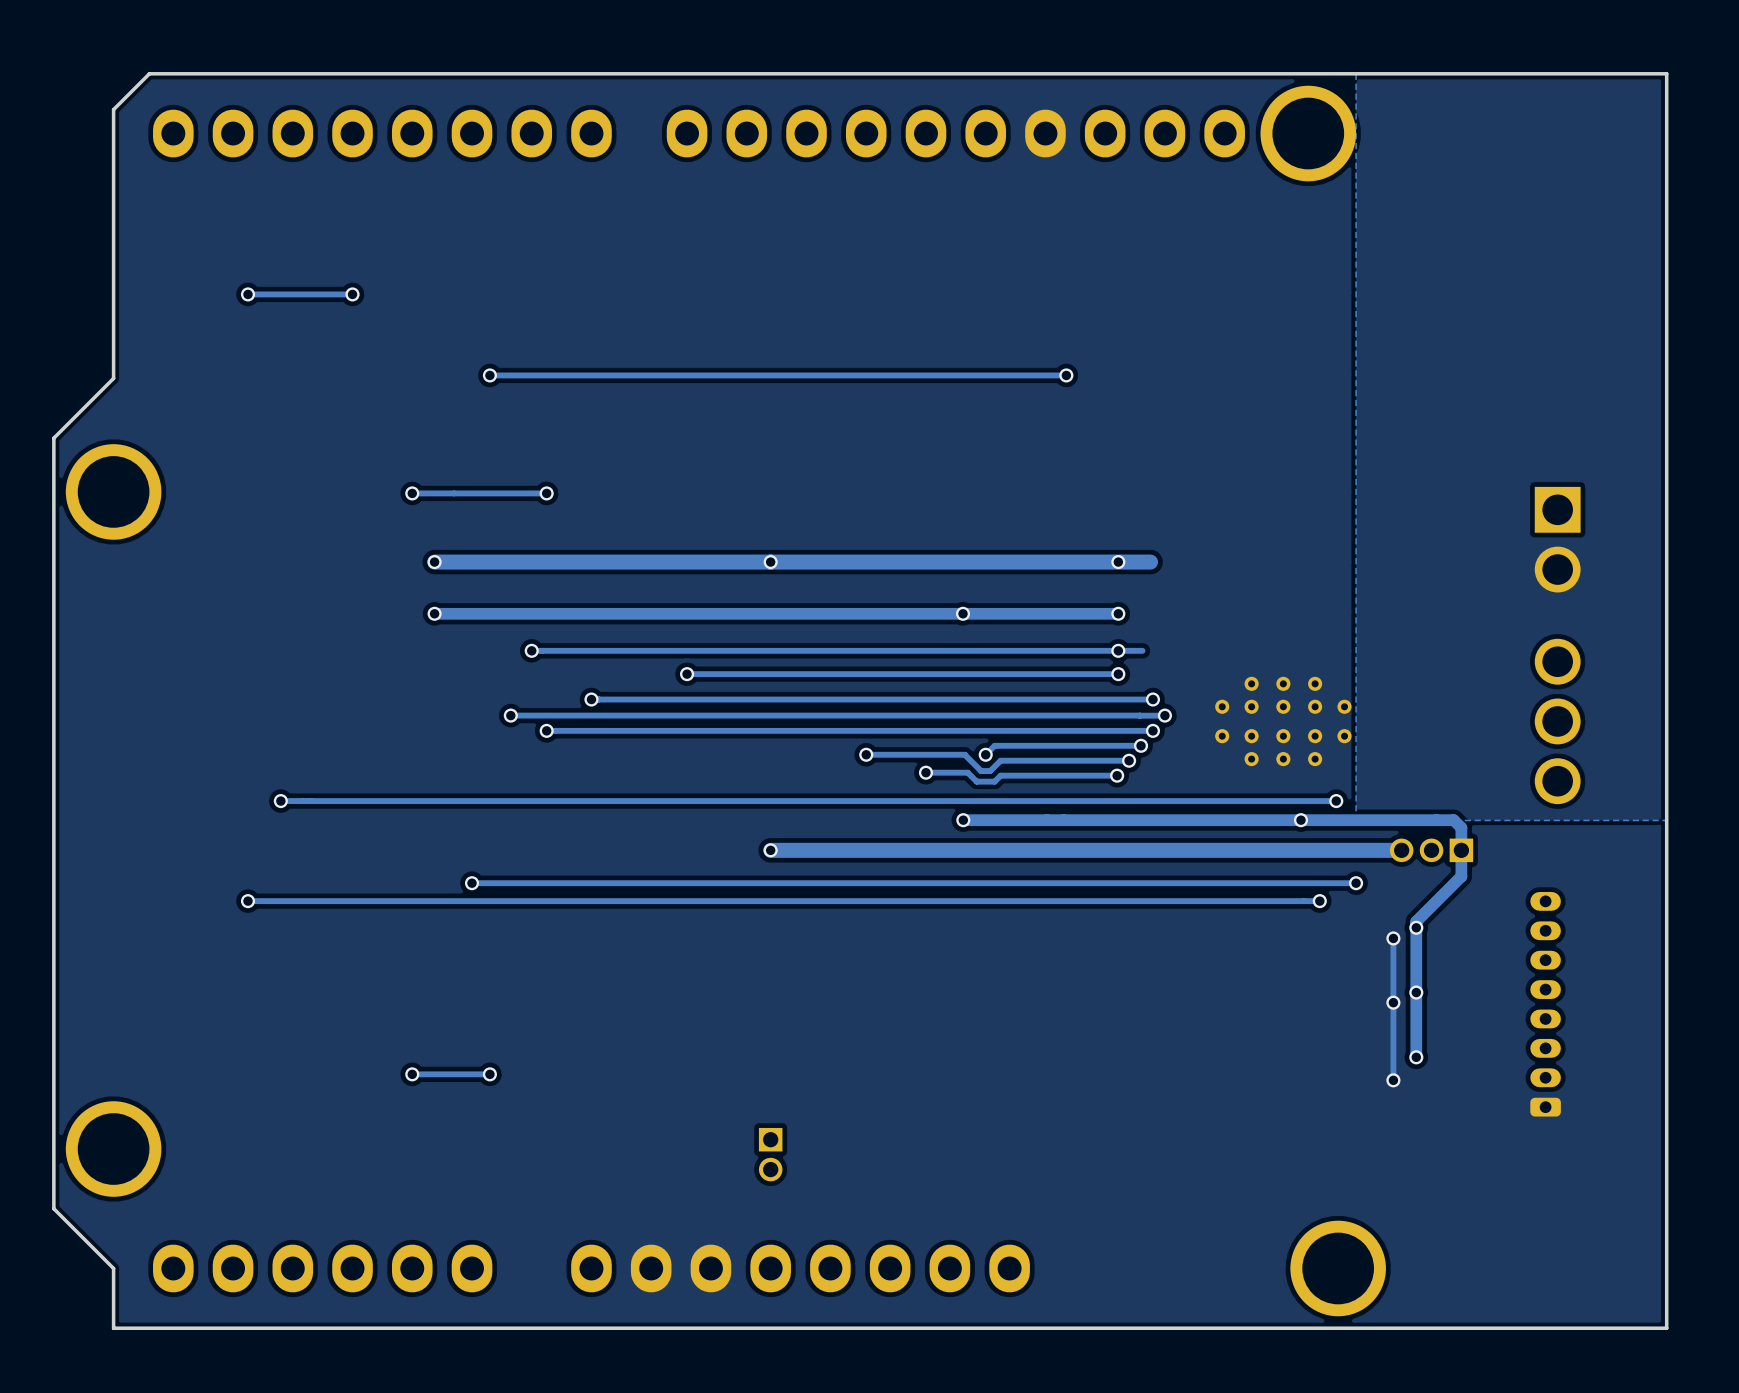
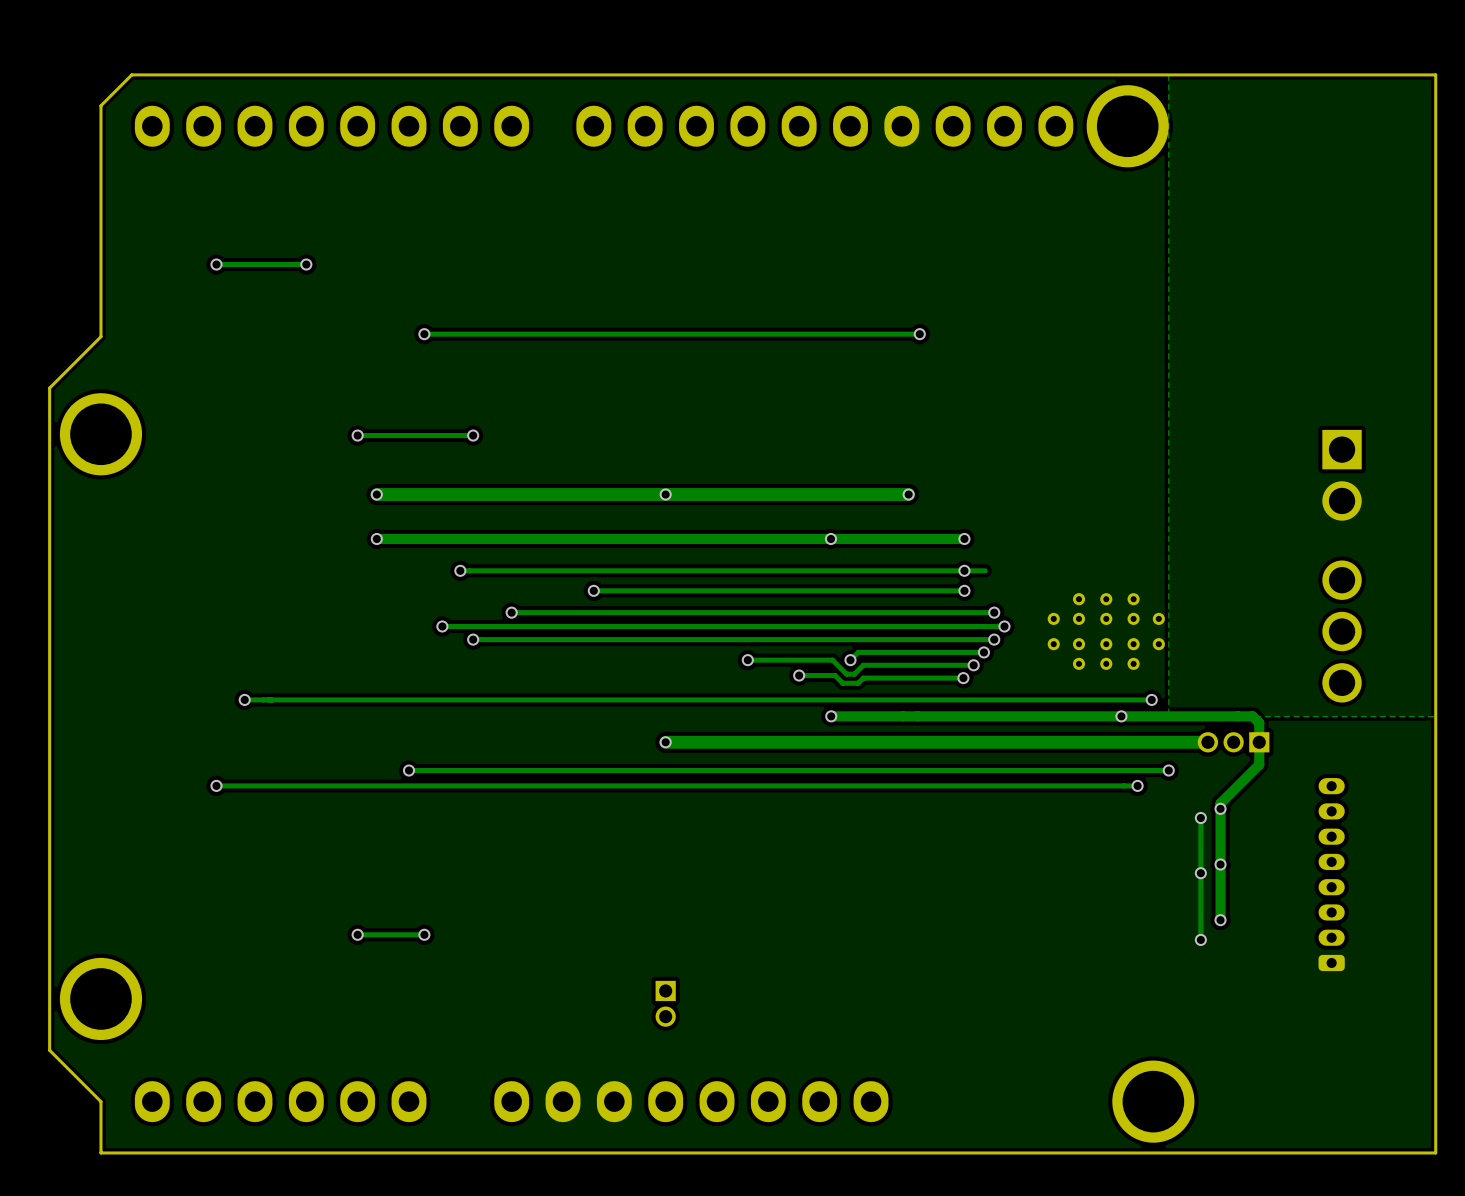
via position: (1118, 562) -> (908, 494)
track: (1150, 562) (1053, 562) -> none

